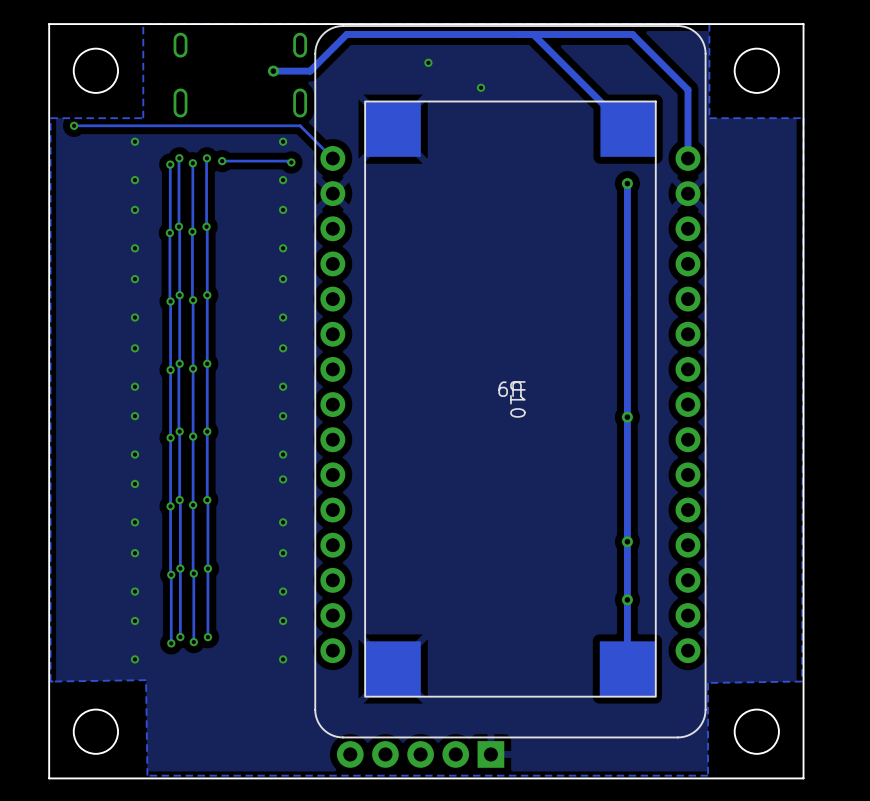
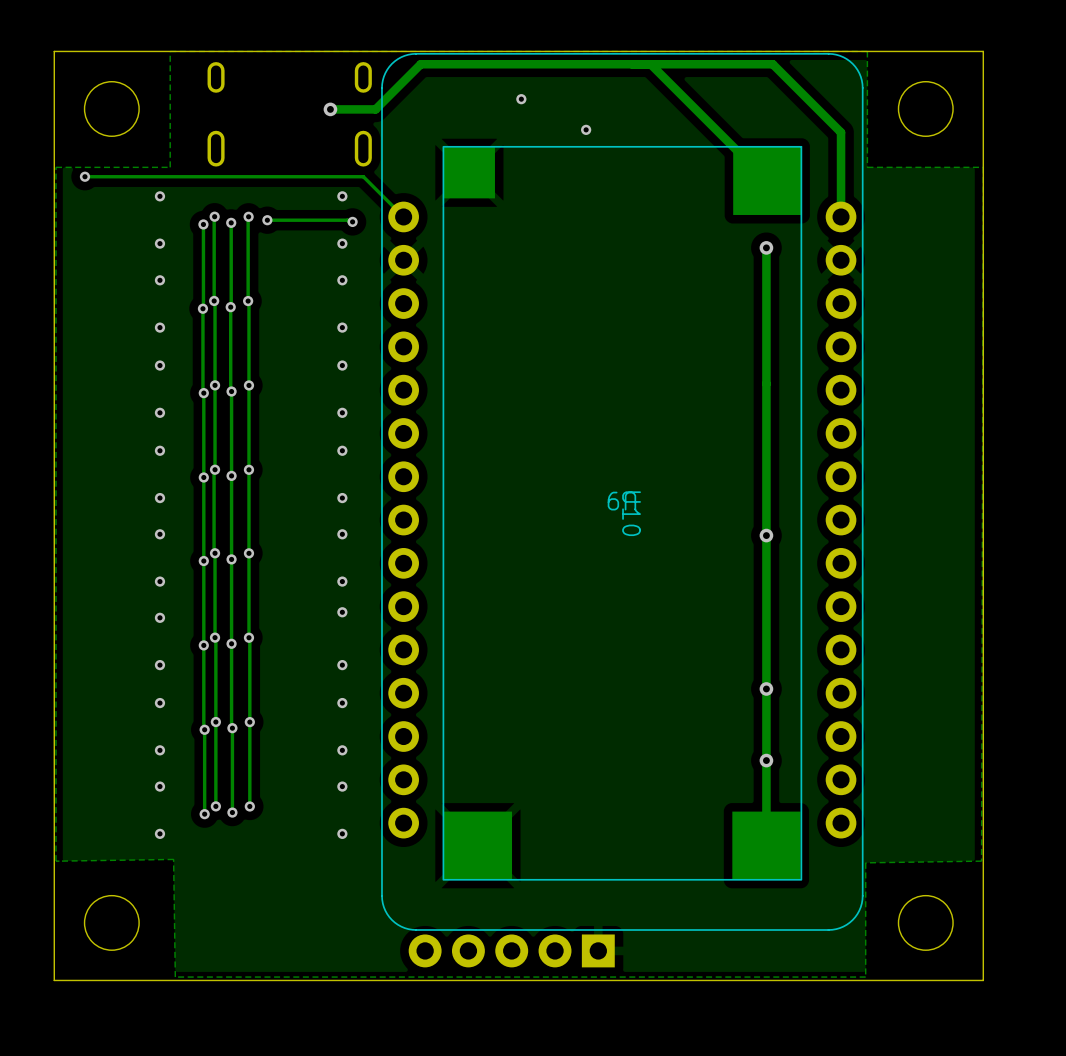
U10 footprint: [364, 100, 657, 698] -> [442, 145, 803, 881]

